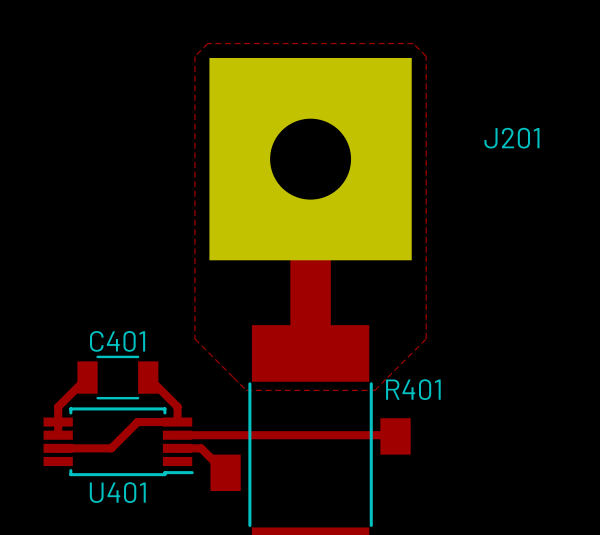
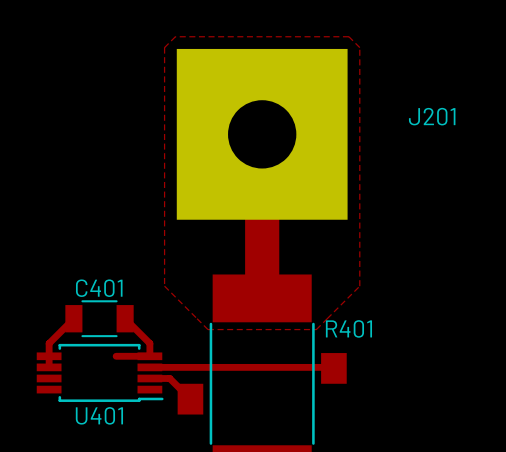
track: (137, 422) (111, 448) (58, 448) -> none

